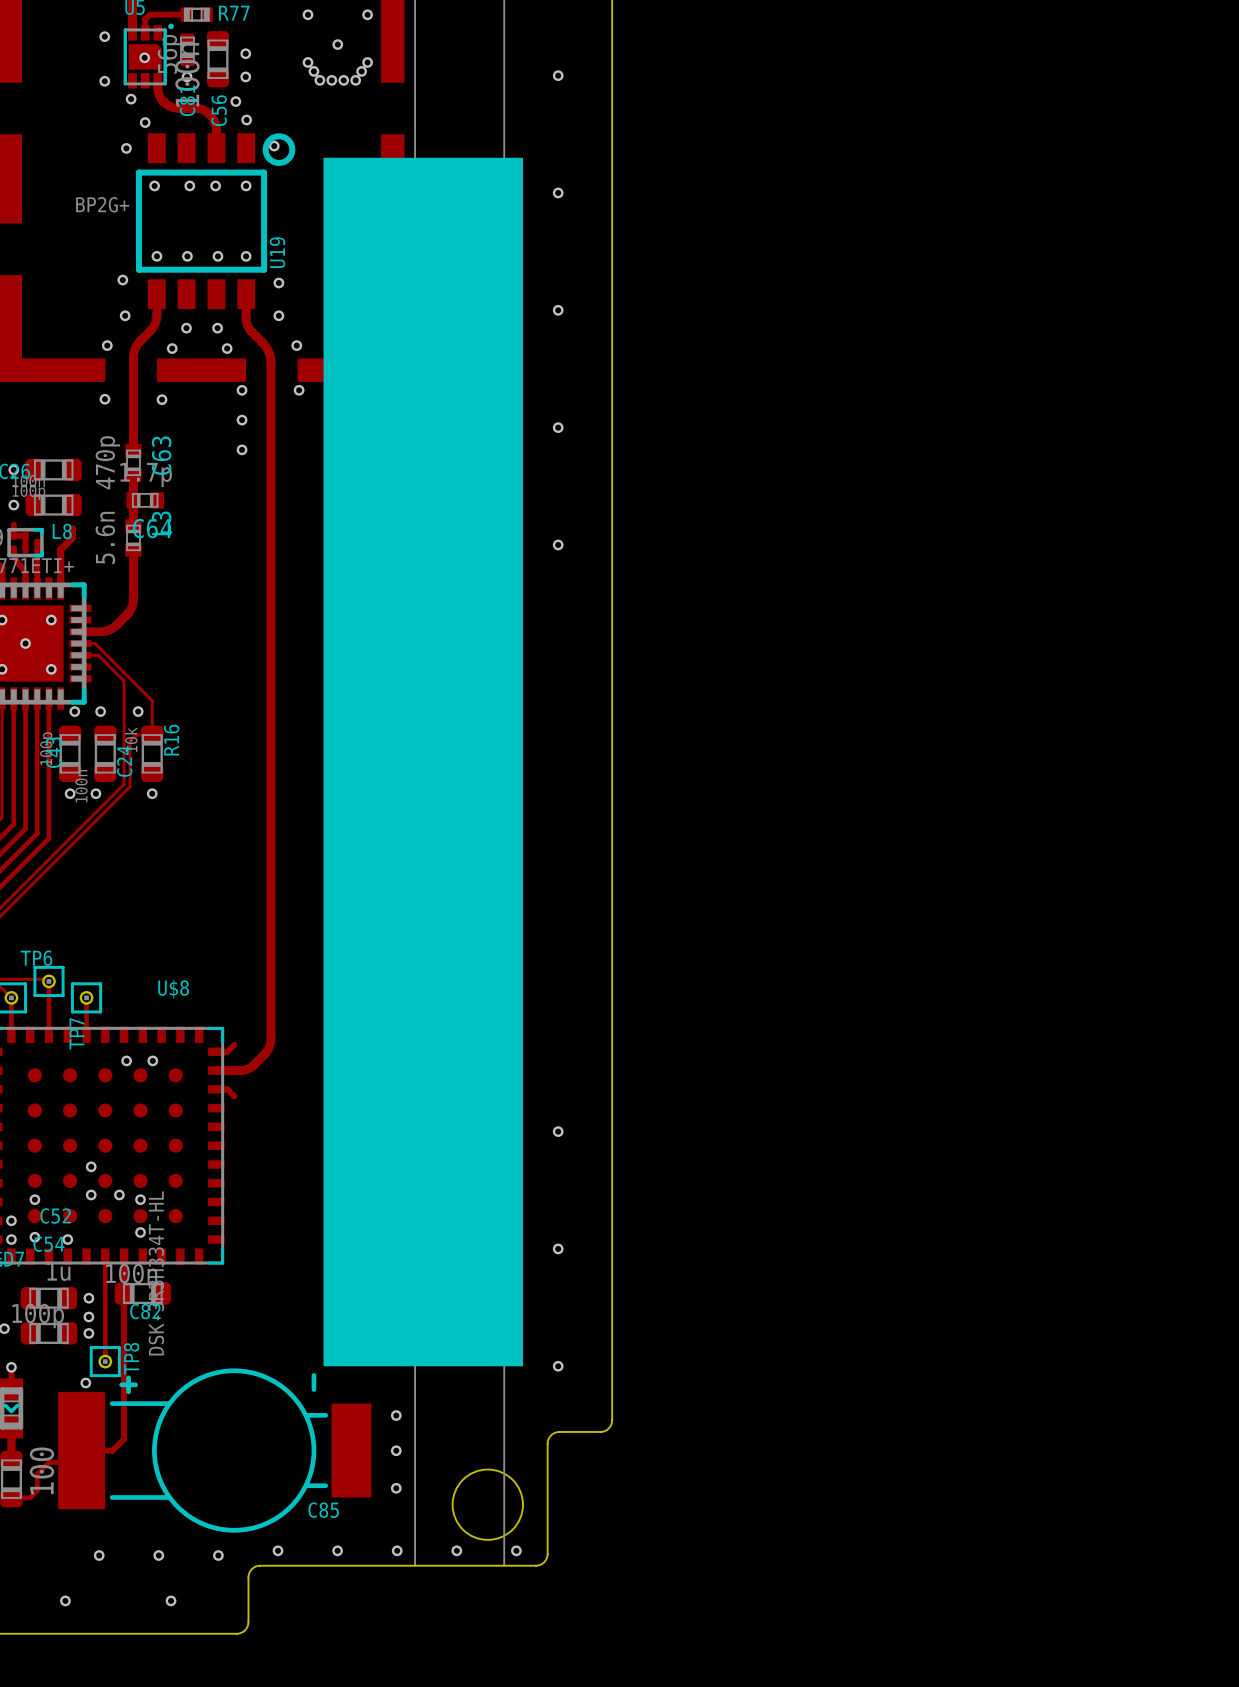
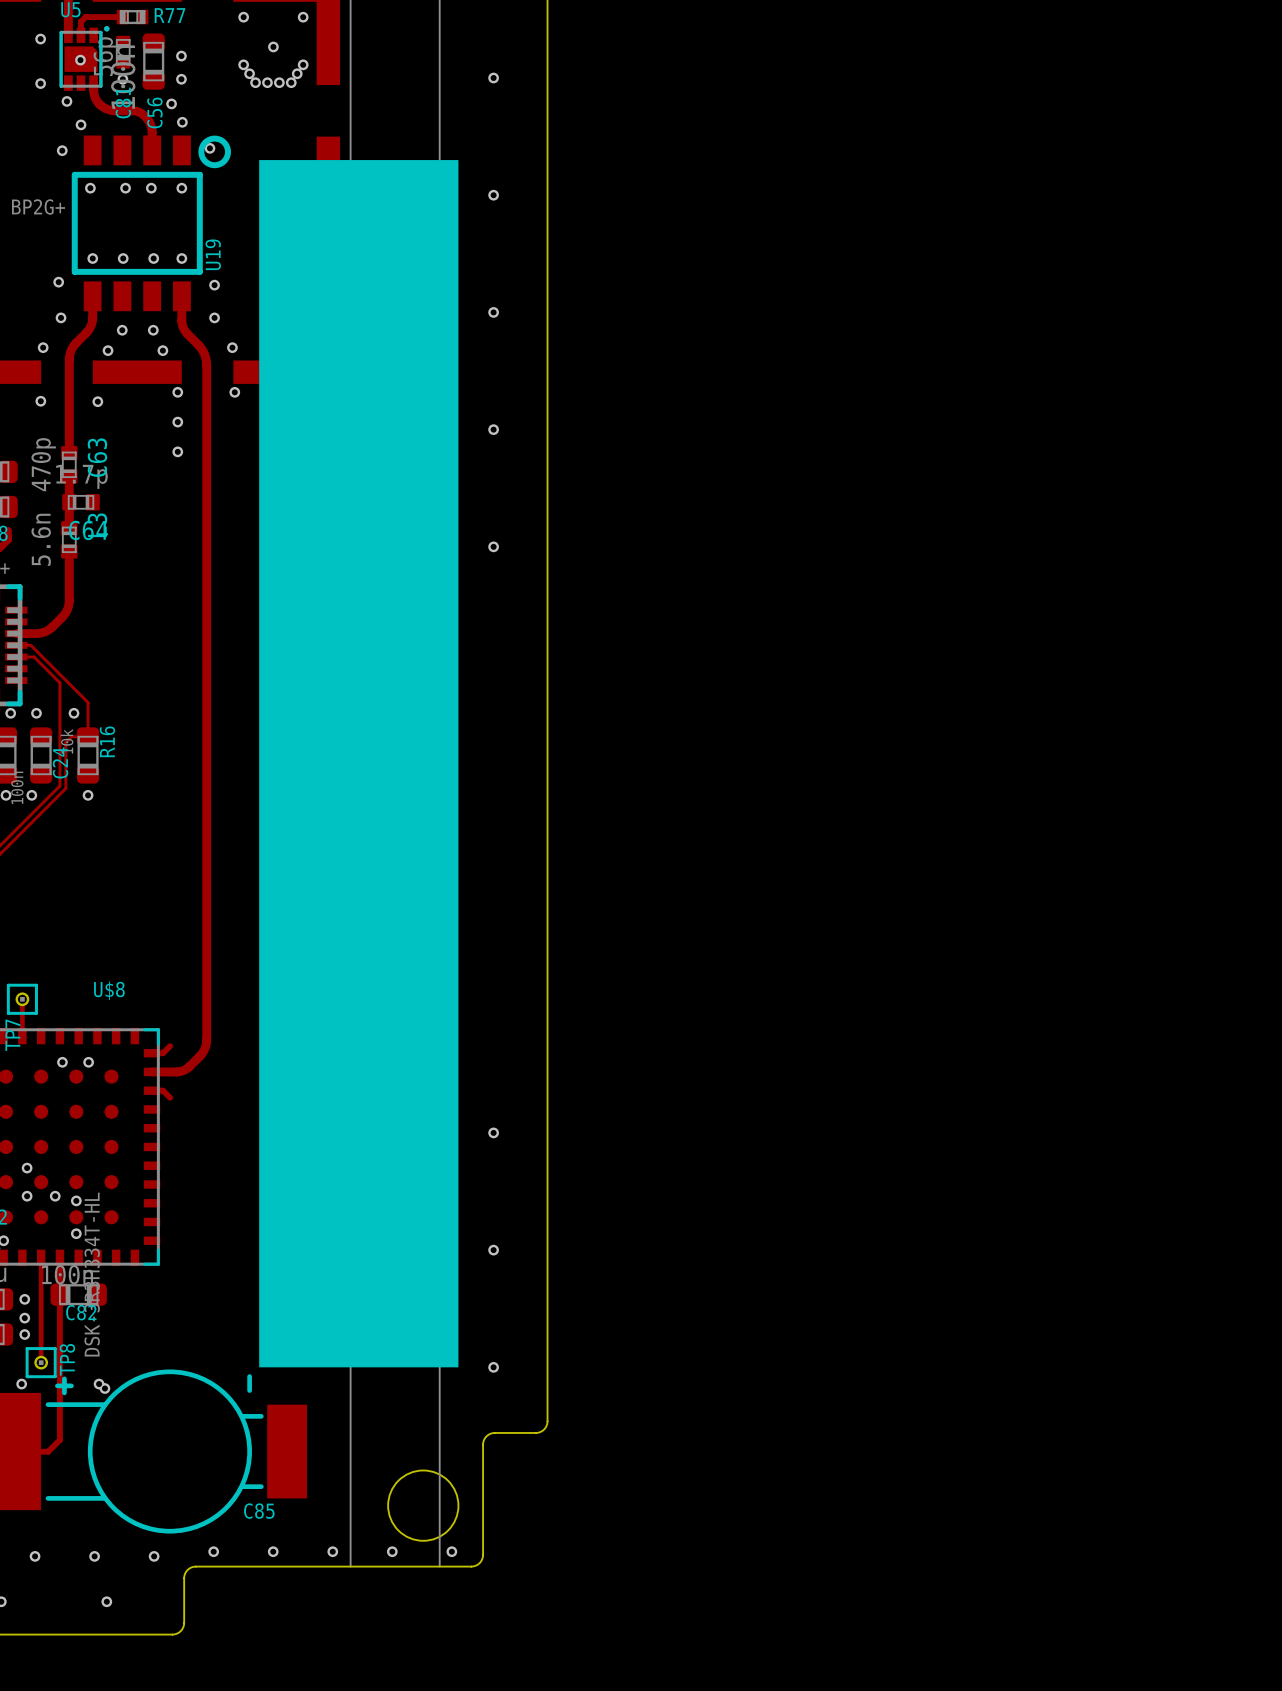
via: none -> (99, 1384)
via: none -> (104, 1388)
via: (396, 1415) -> none
via: (396, 1450) -> none
via: (396, 1488) -> none

